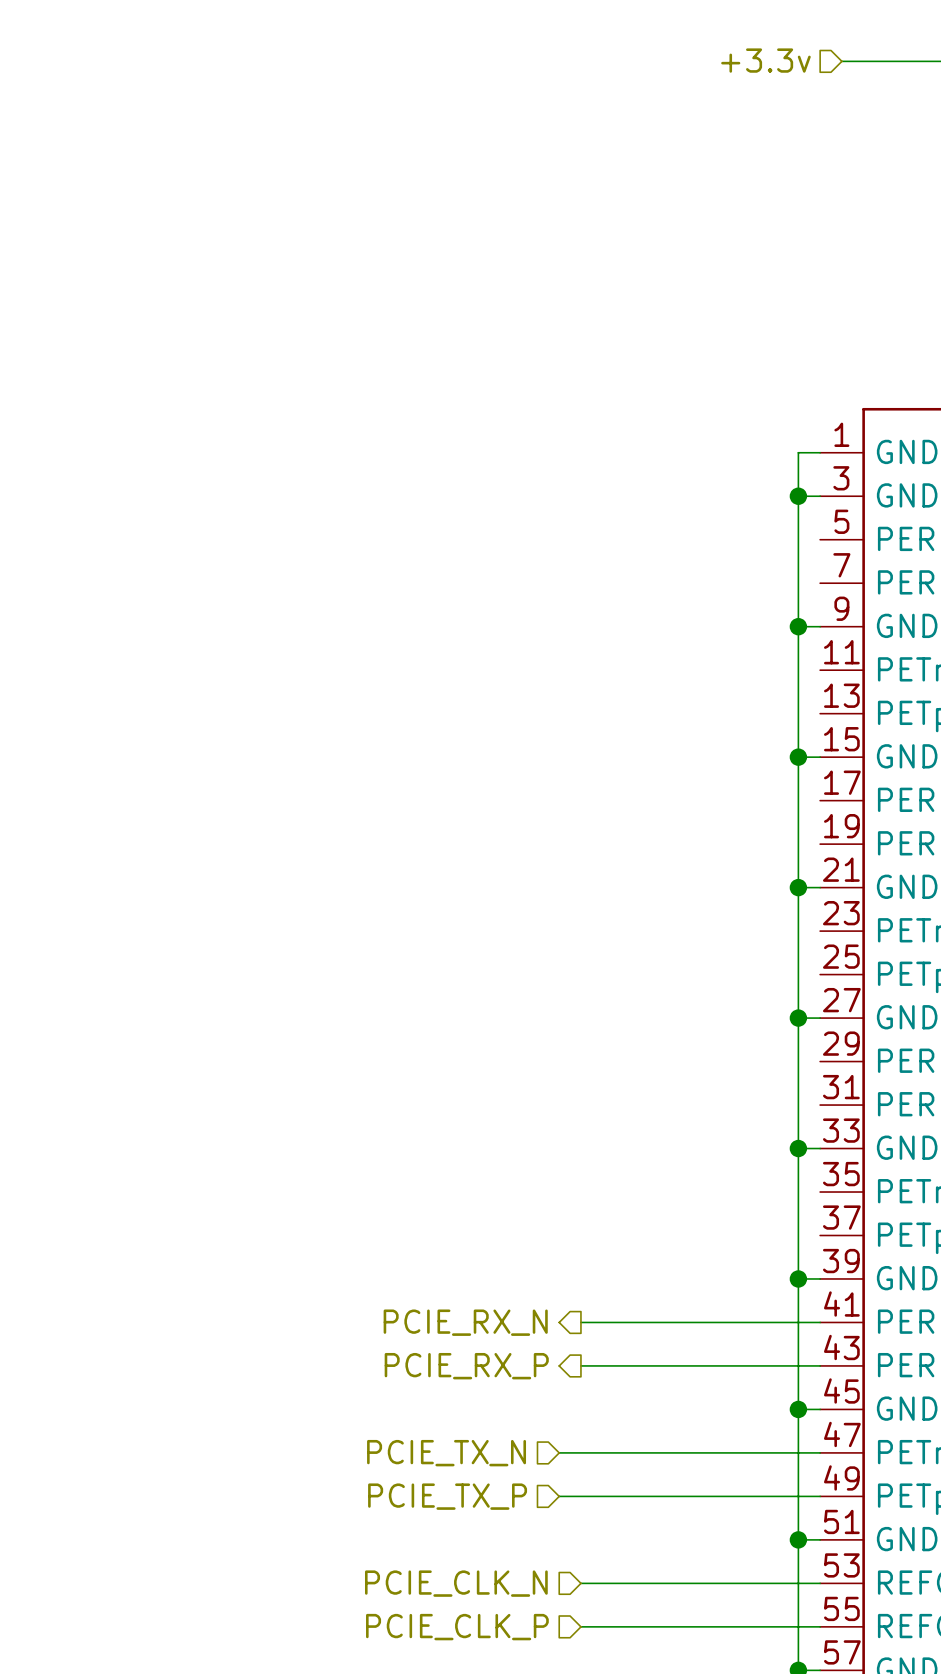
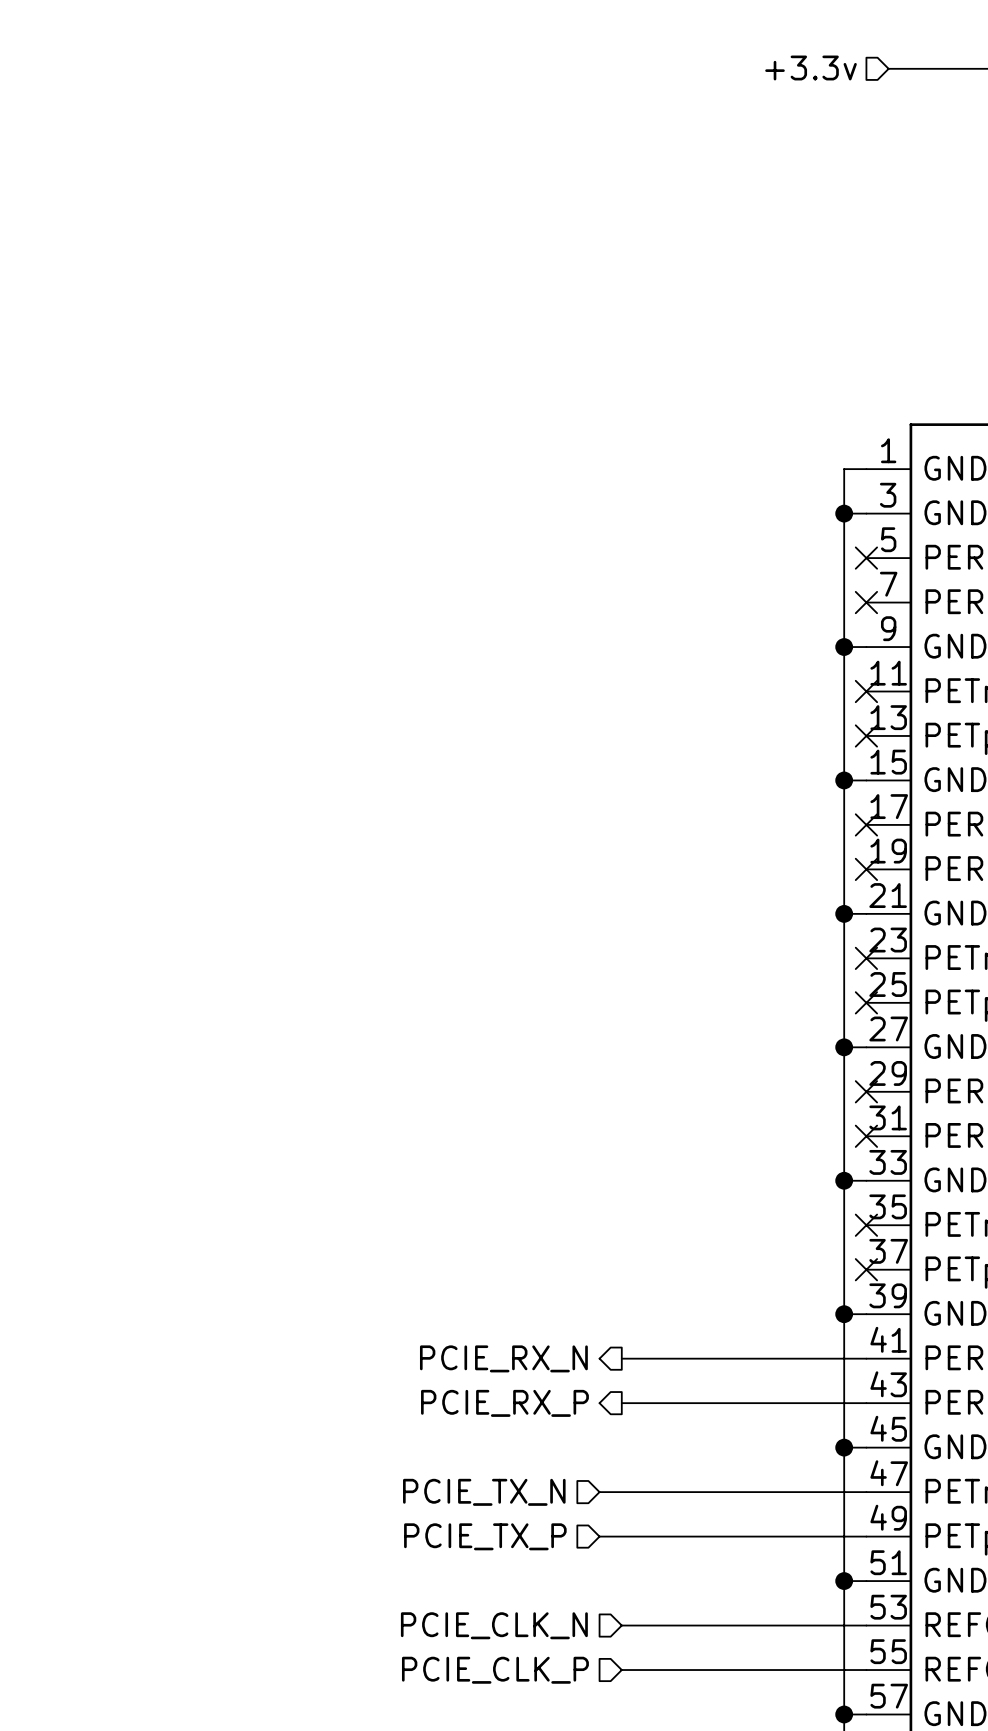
no-connect mark: none -> (866, 558)
no-connect mark: none -> (866, 602)
no-connect mark: none -> (866, 691)
no-connect mark: none -> (866, 735)
no-connect mark: none -> (866, 824)
no-connect mark: none -> (866, 869)
no-connect mark: none -> (866, 958)
no-connect mark: none -> (866, 1002)
no-connect mark: none -> (866, 1091)
no-connect mark: none -> (866, 1136)
no-connect mark: none -> (866, 1225)
no-connect mark: none -> (866, 1269)

